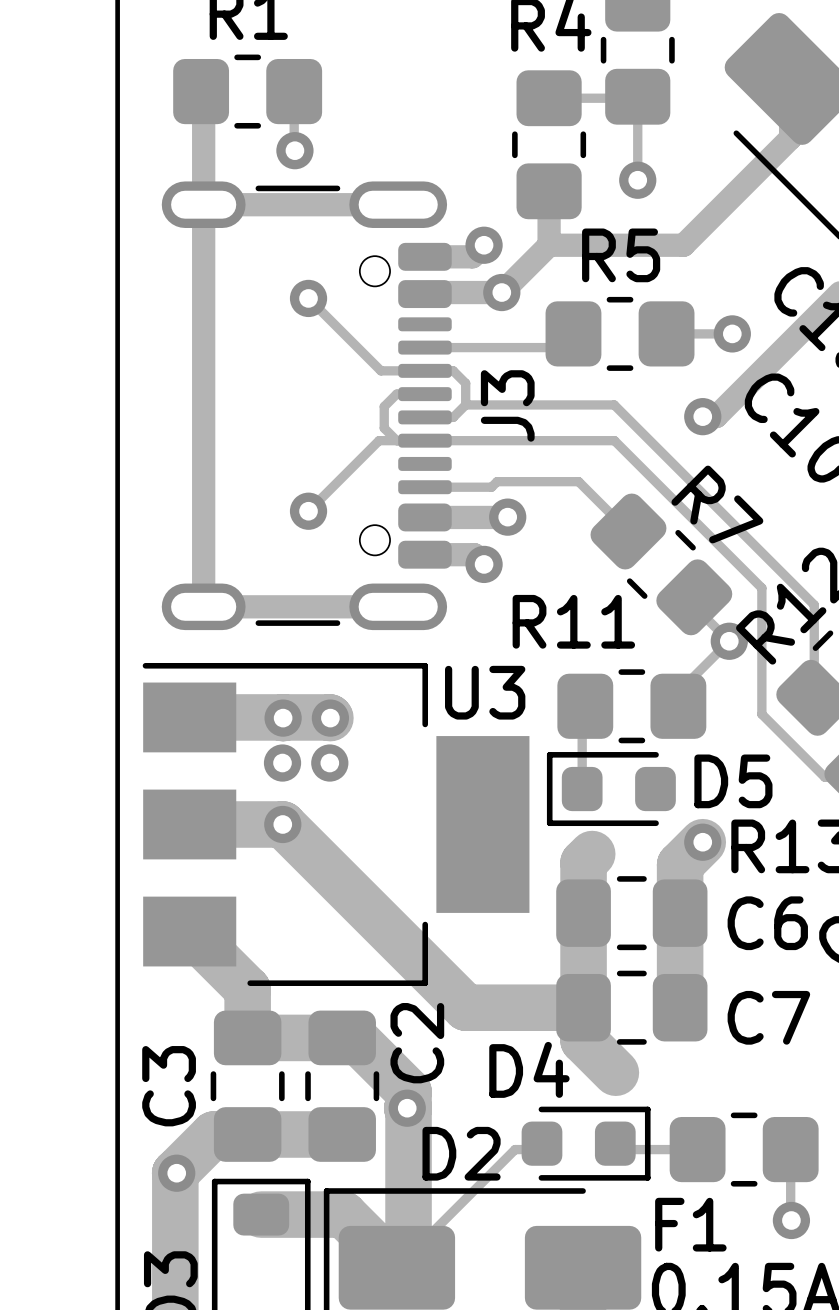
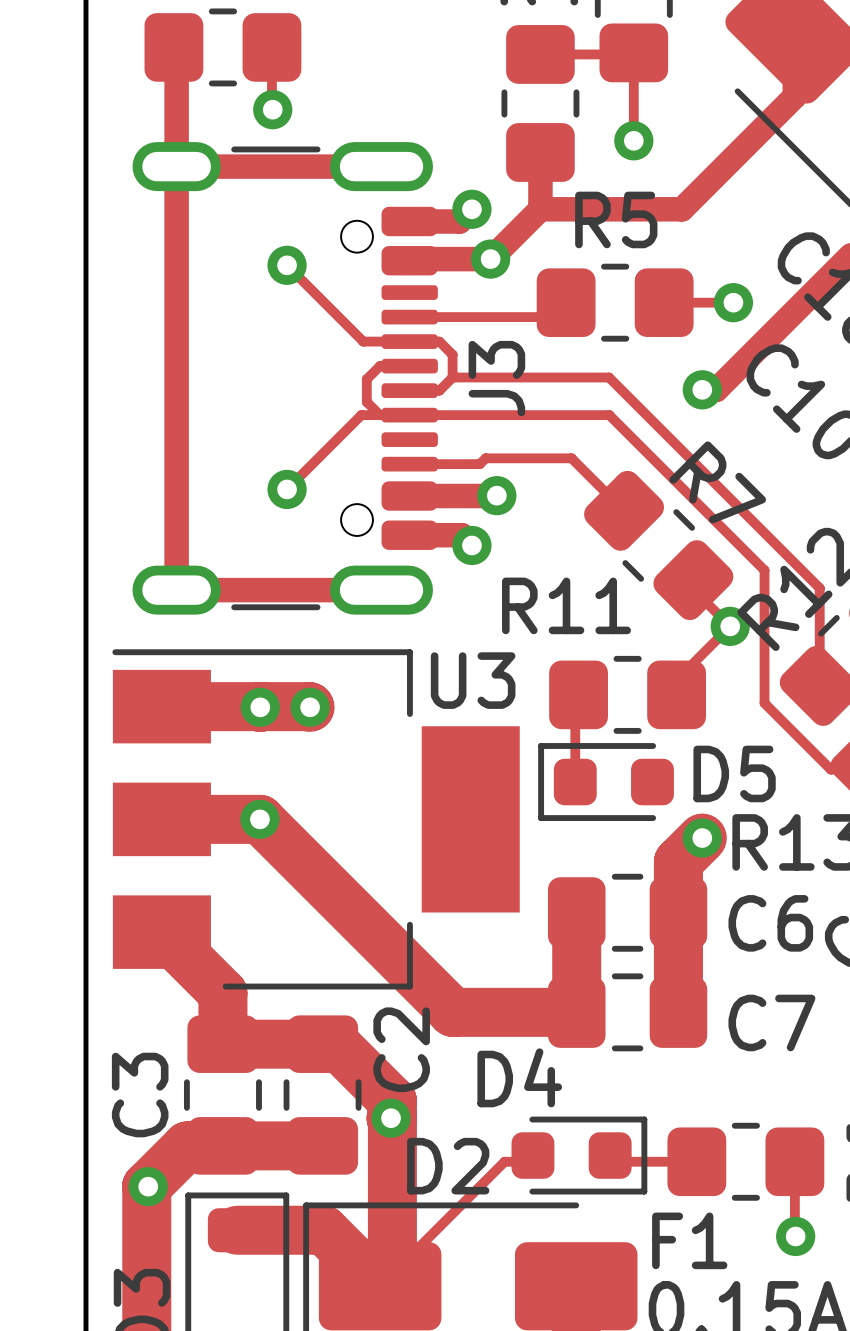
via: (282, 763) -> none
via: (329, 763) -> none
track: (592, 854) (583, 862) (583, 913) -> none
track: (583, 1007) (583, 1040) (615, 1072) -> none

